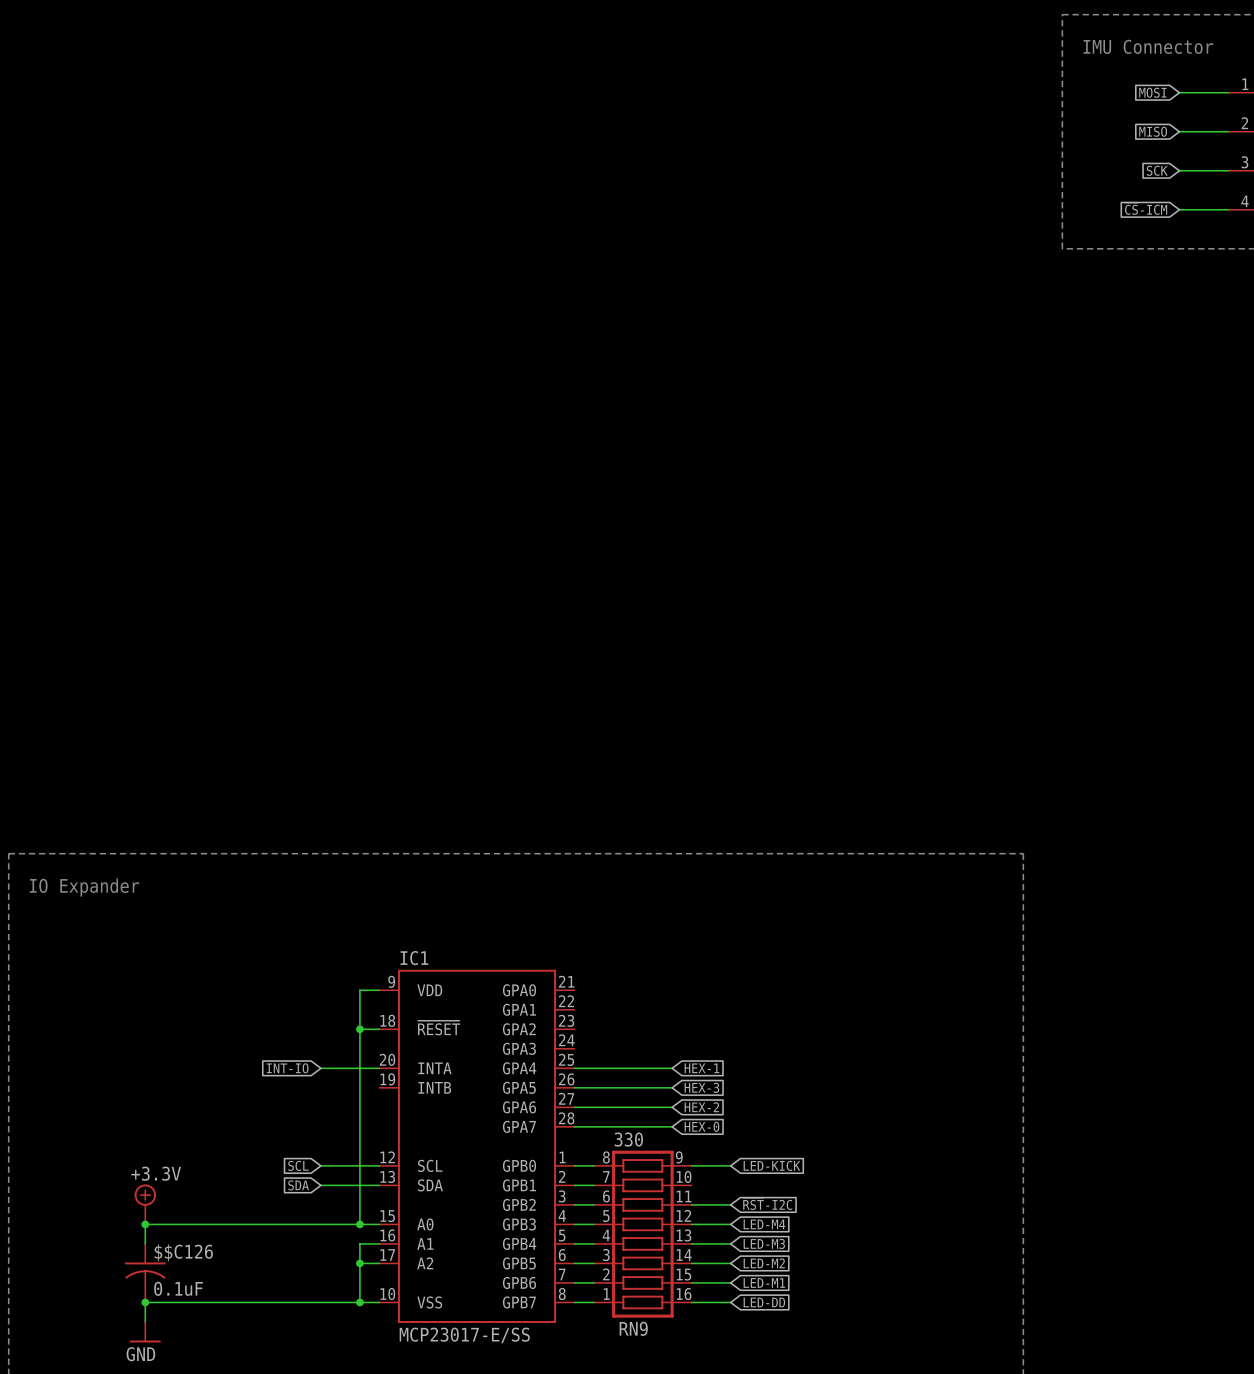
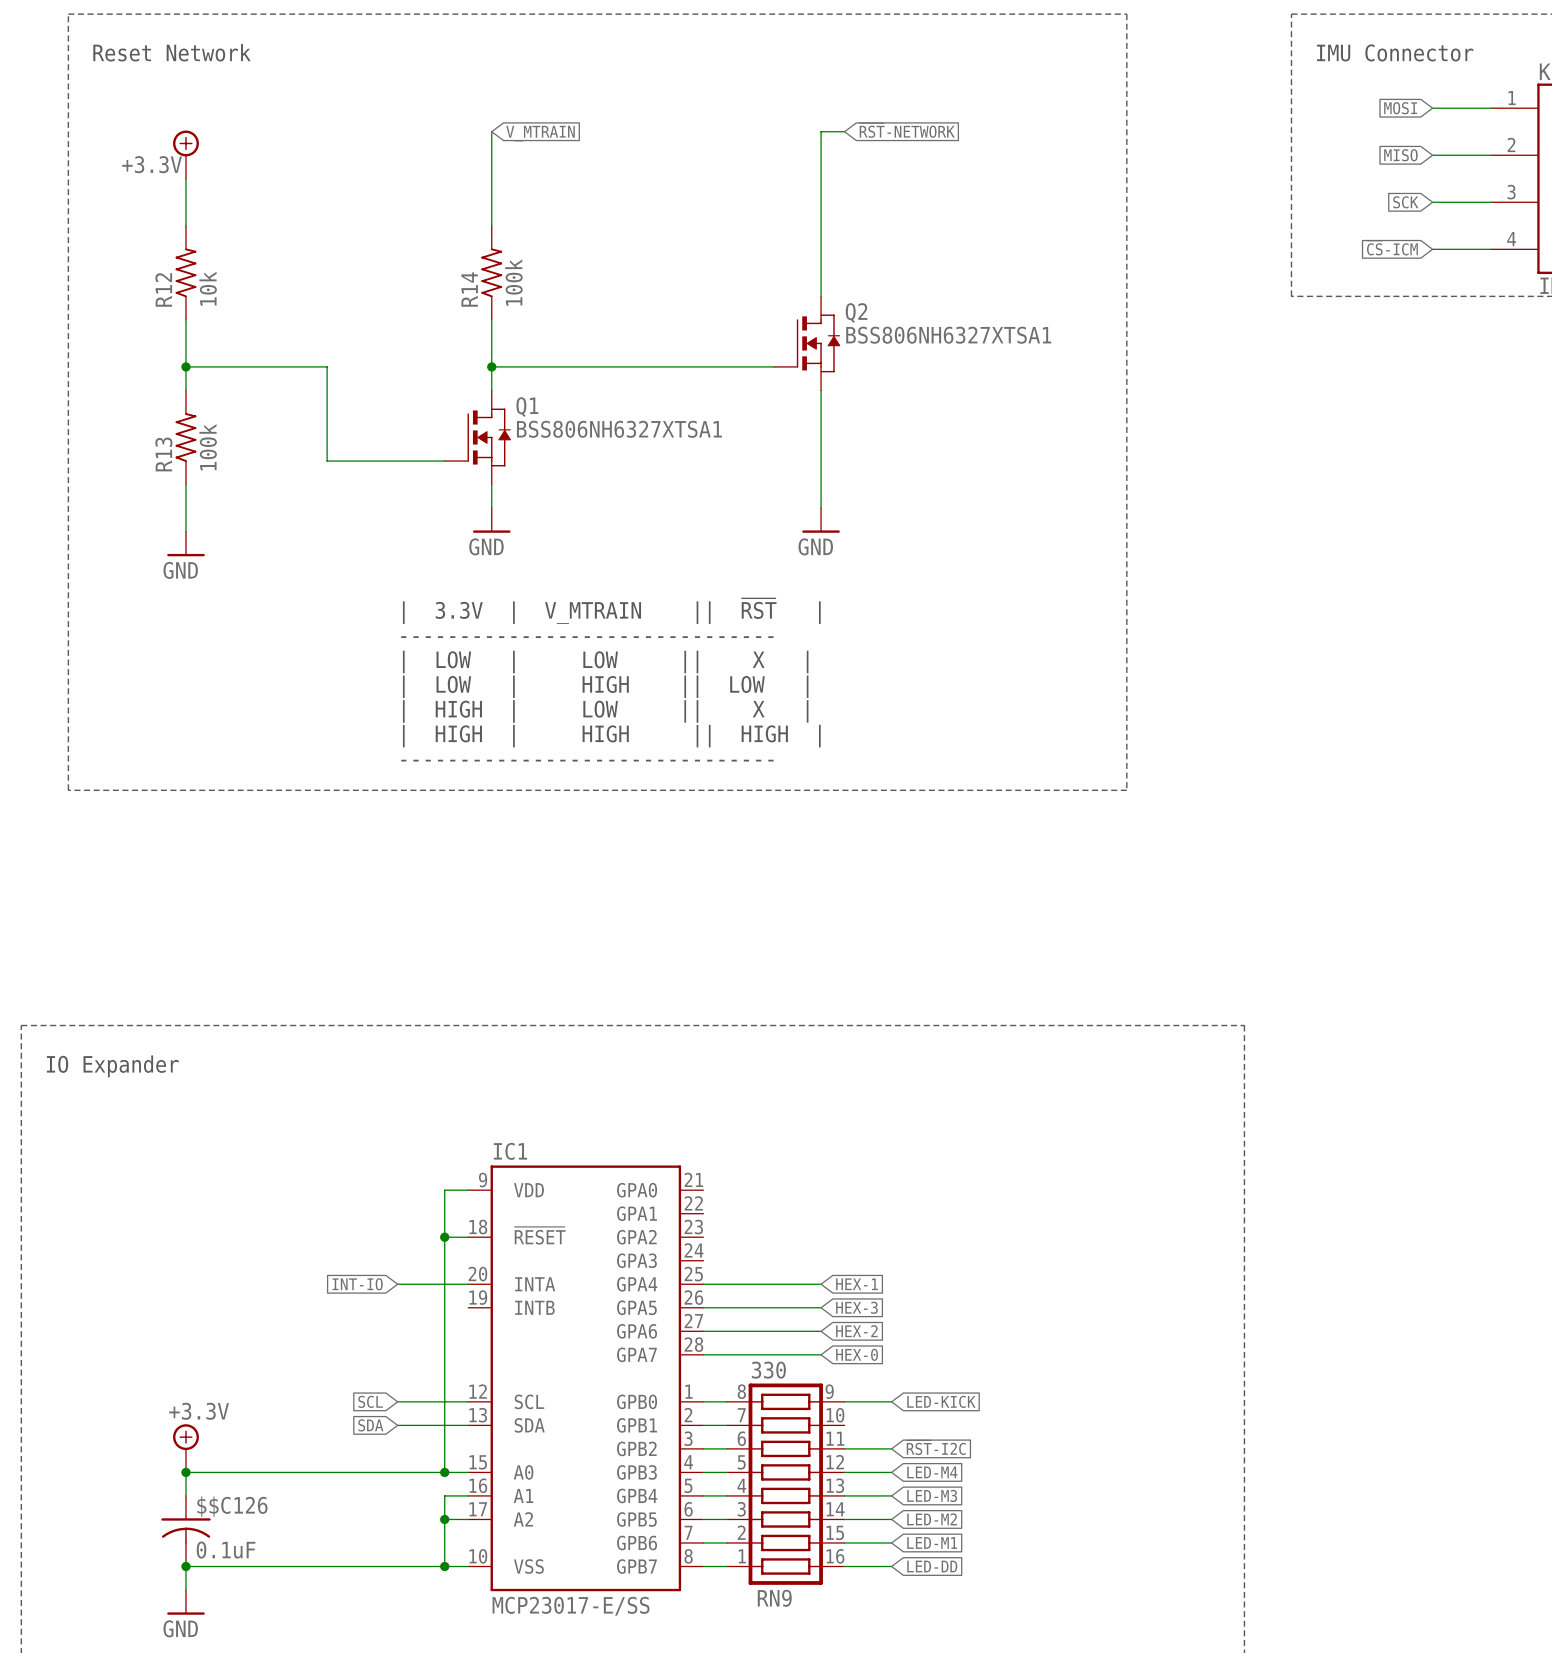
line: none -> (68, 14) (1126, 14) (1126, 790) (68, 790) (68, 14)
text: none -> Reset Network (171, 52)
global label: none -> ~{RST}-NETWORK (907, 130)
wire: none -> (491, 131) (491, 225)
wire: none -> (844, 131) (821, 131) (821, 296)
global label: none -> V_MTRAIN (540, 133)
power symbol: none -> +3.3V (185, 154)
wire: none -> (185, 178) (185, 225)
R12: none -> 10k (185, 272)
R14: none -> 100k (491, 272)
wire: none -> (185, 319) (185, 390)
wire: none -> (491, 319) (491, 390)
Q2: none -> BSS806NH6327XTSA1 (807, 343)
wire: none -> (185, 366) (327, 366) (327, 461) (444, 461)
junction: none -> (185, 366)
wire: none -> (491, 366) (774, 366)
junction: none -> (491, 366)
wire: none -> (821, 390) (821, 508)
R13: none -> 100k (185, 437)
Q1: none -> BSS806NH6327XTSA1 (477, 437)
wire: none -> (185, 484) (185, 531)
wire: none -> (491, 484) (491, 508)
power symbol: none -> GND (491, 520)
power symbol: none -> GND (821, 520)
power symbol: none -> GND (185, 543)
text: none -> | 3.3V | V_MTRAIN || ~{RST} | (611, 611)
text: none -> ------------------------------- (587, 637)
text: none -> | LOW | LOW || X | (605, 662)
text: none -> | LOW | HIGH || LOW | (605, 686)
text: none -> | HIGH | LOW || X | (605, 711)
text: none -> | HIGH | HIGH || HIGH | (611, 736)
text: none -> ------------------------------- (587, 760)

